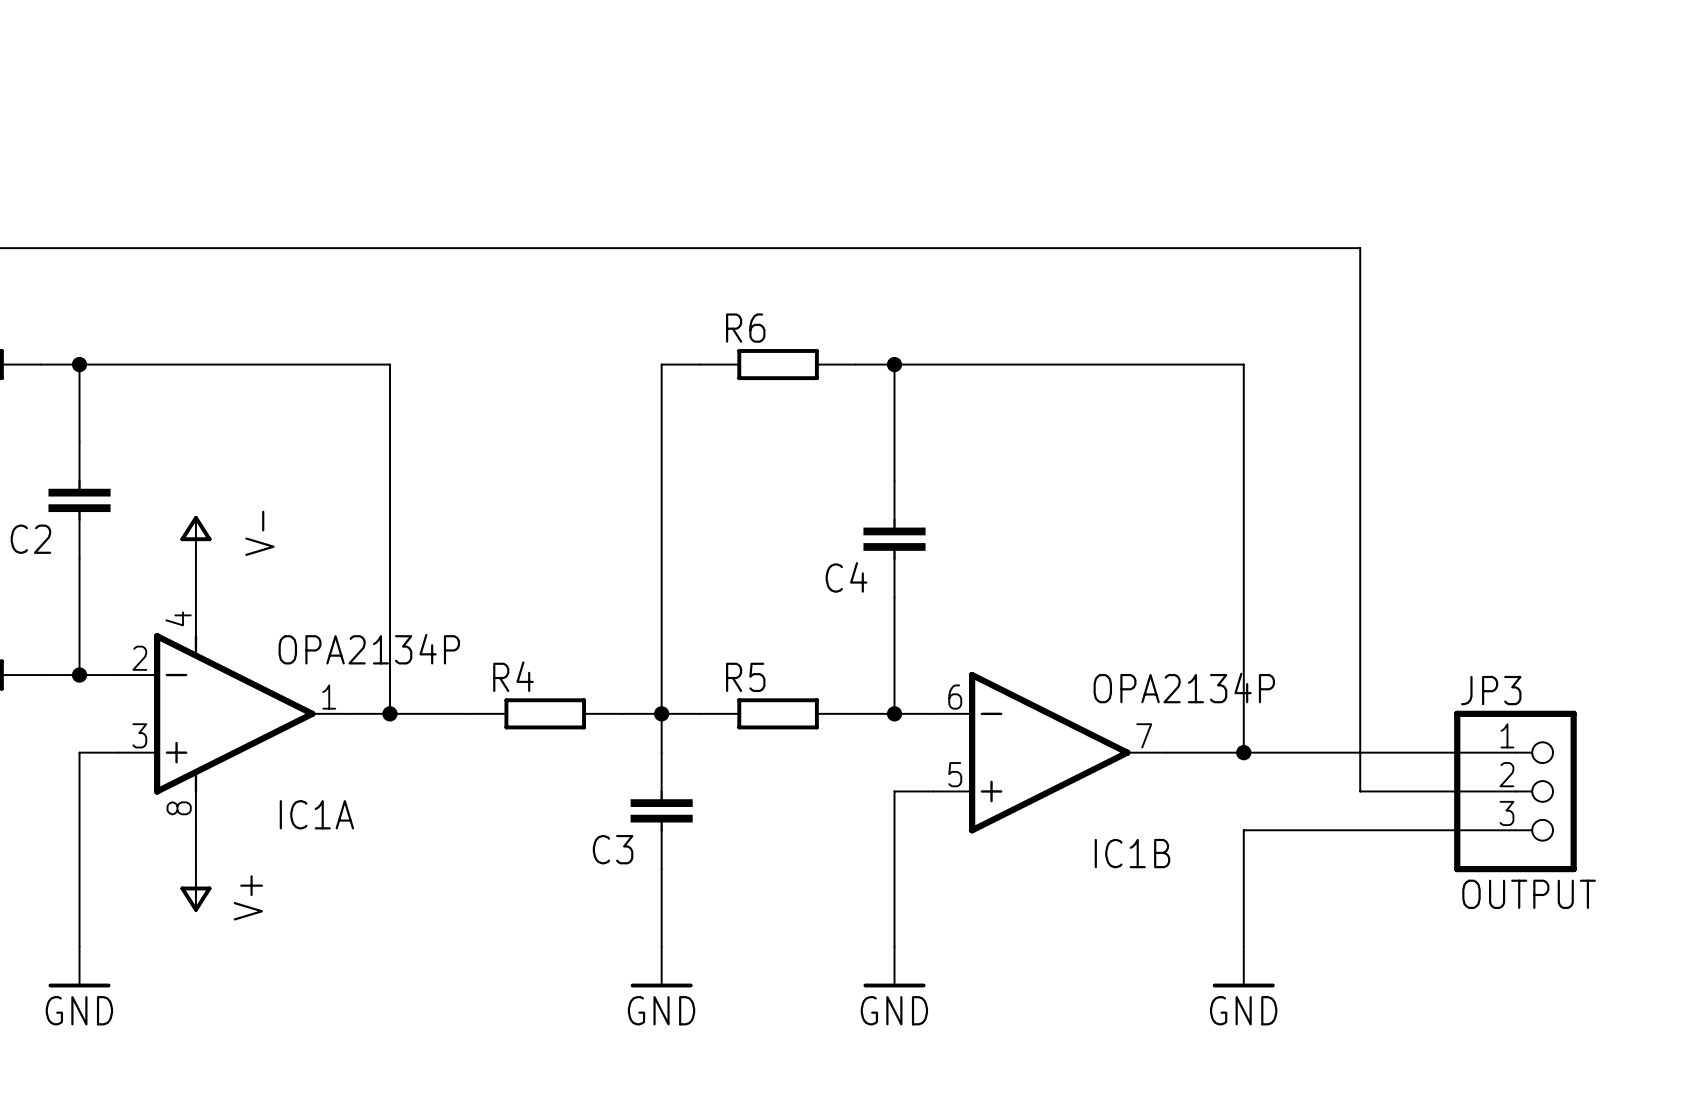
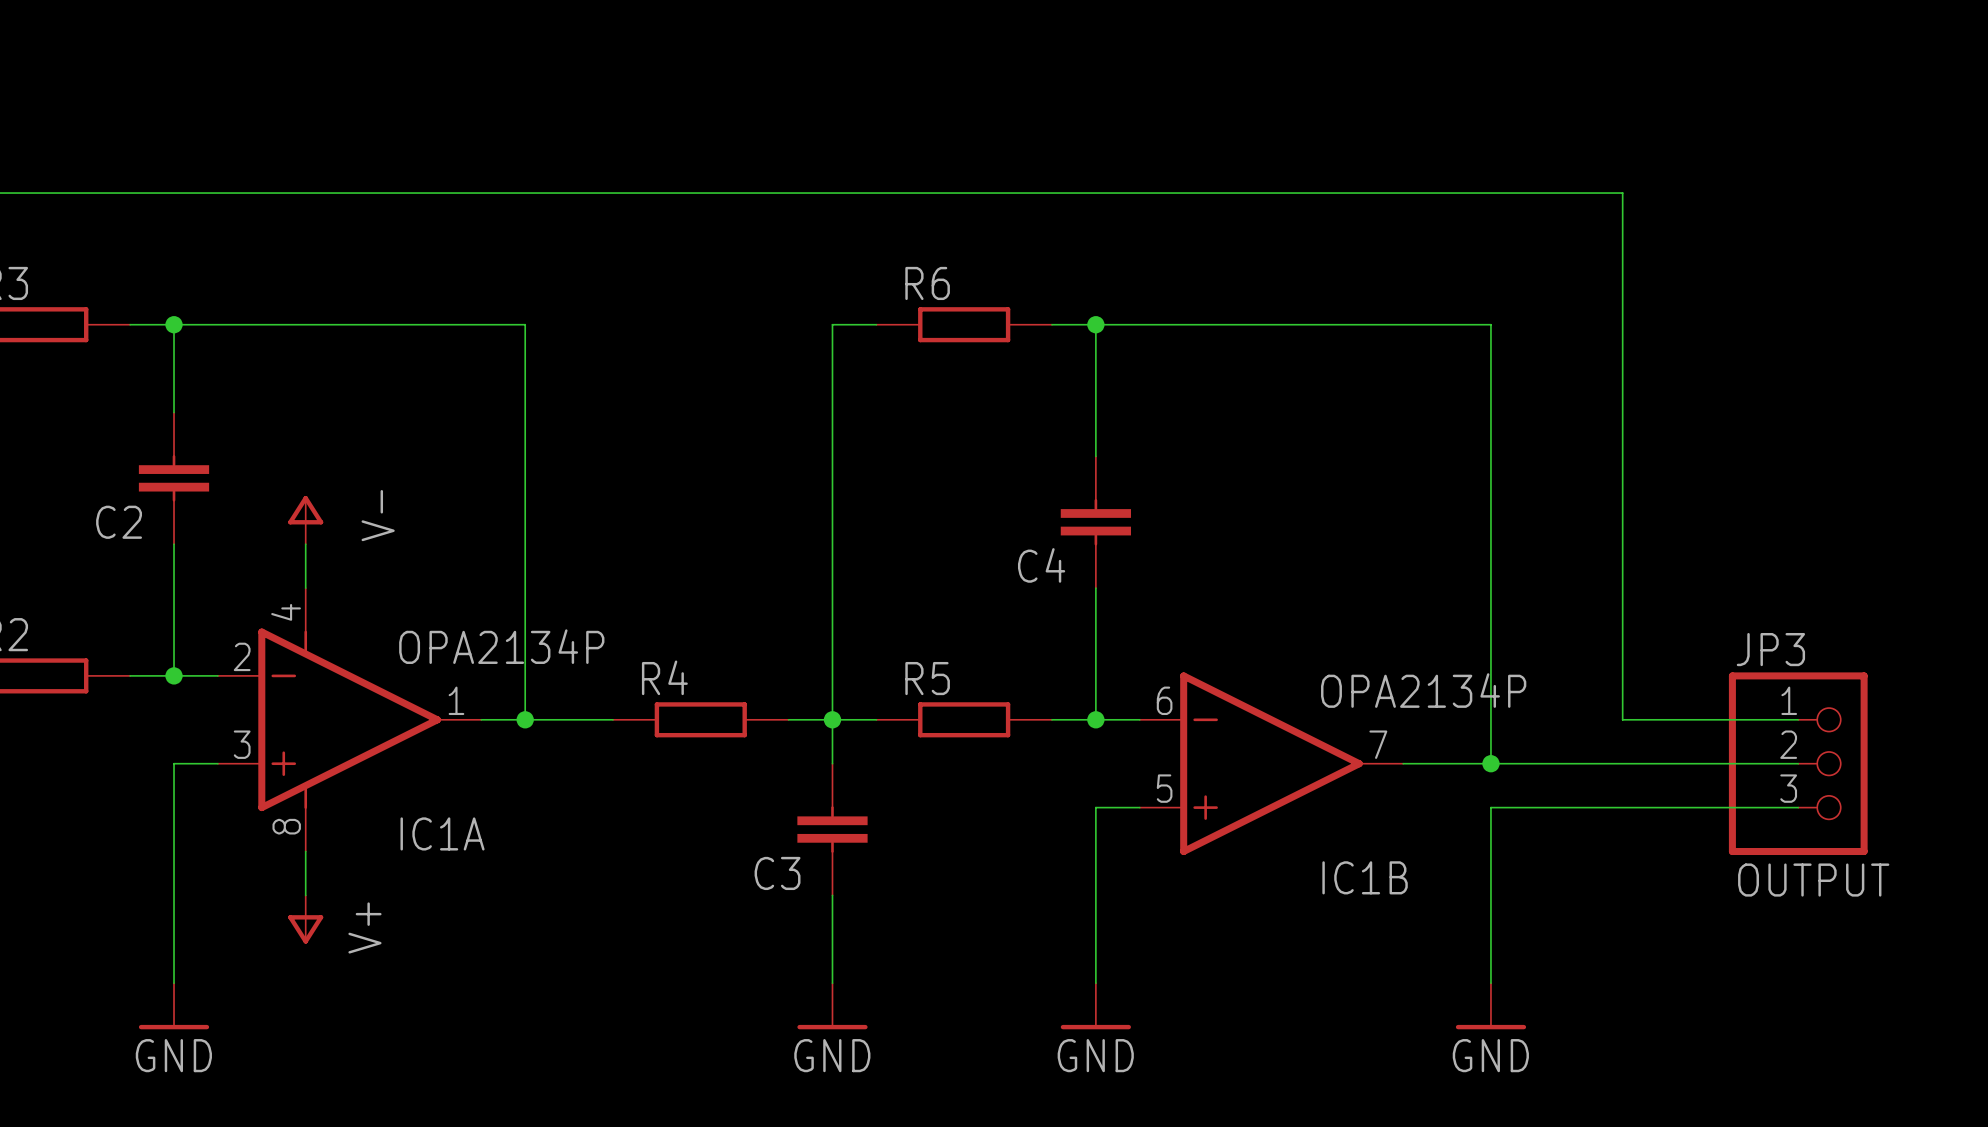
wire: (1360, 713) (1360, 791) -> (1622, 719) (1798, 719)
JP3 position: (1515, 791) -> (1798, 763)
wire: (1243, 830) (1515, 830) -> (1490, 851) (1490, 807) (1622, 807)

